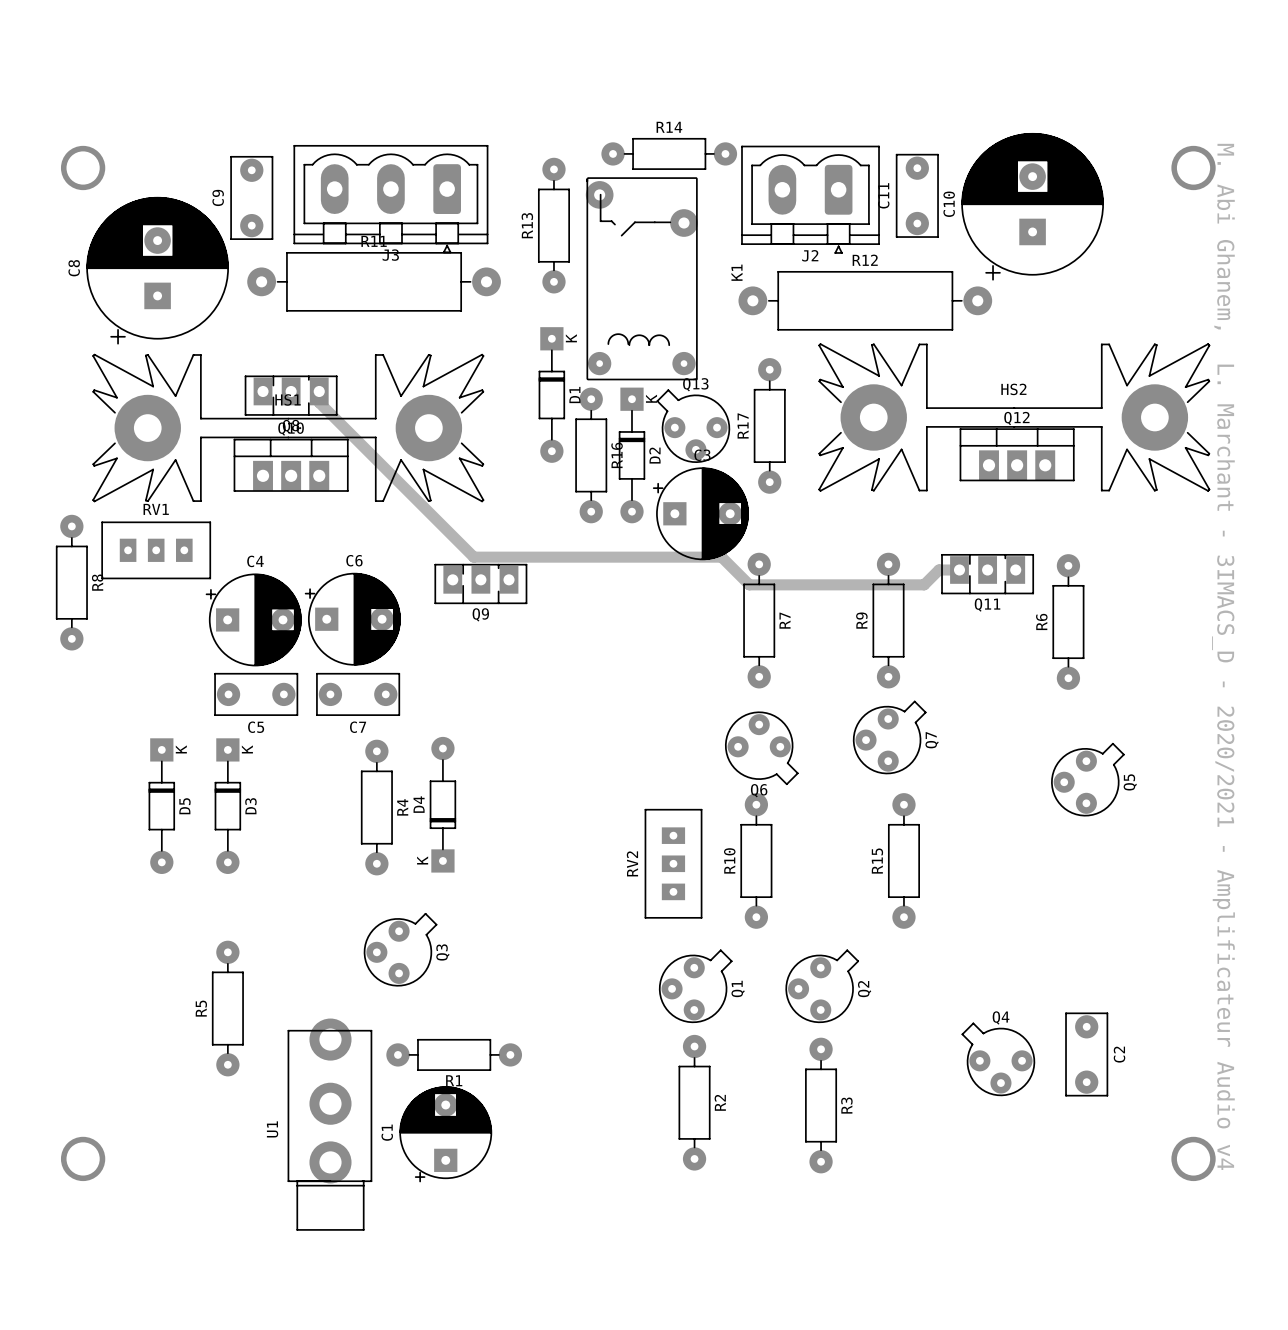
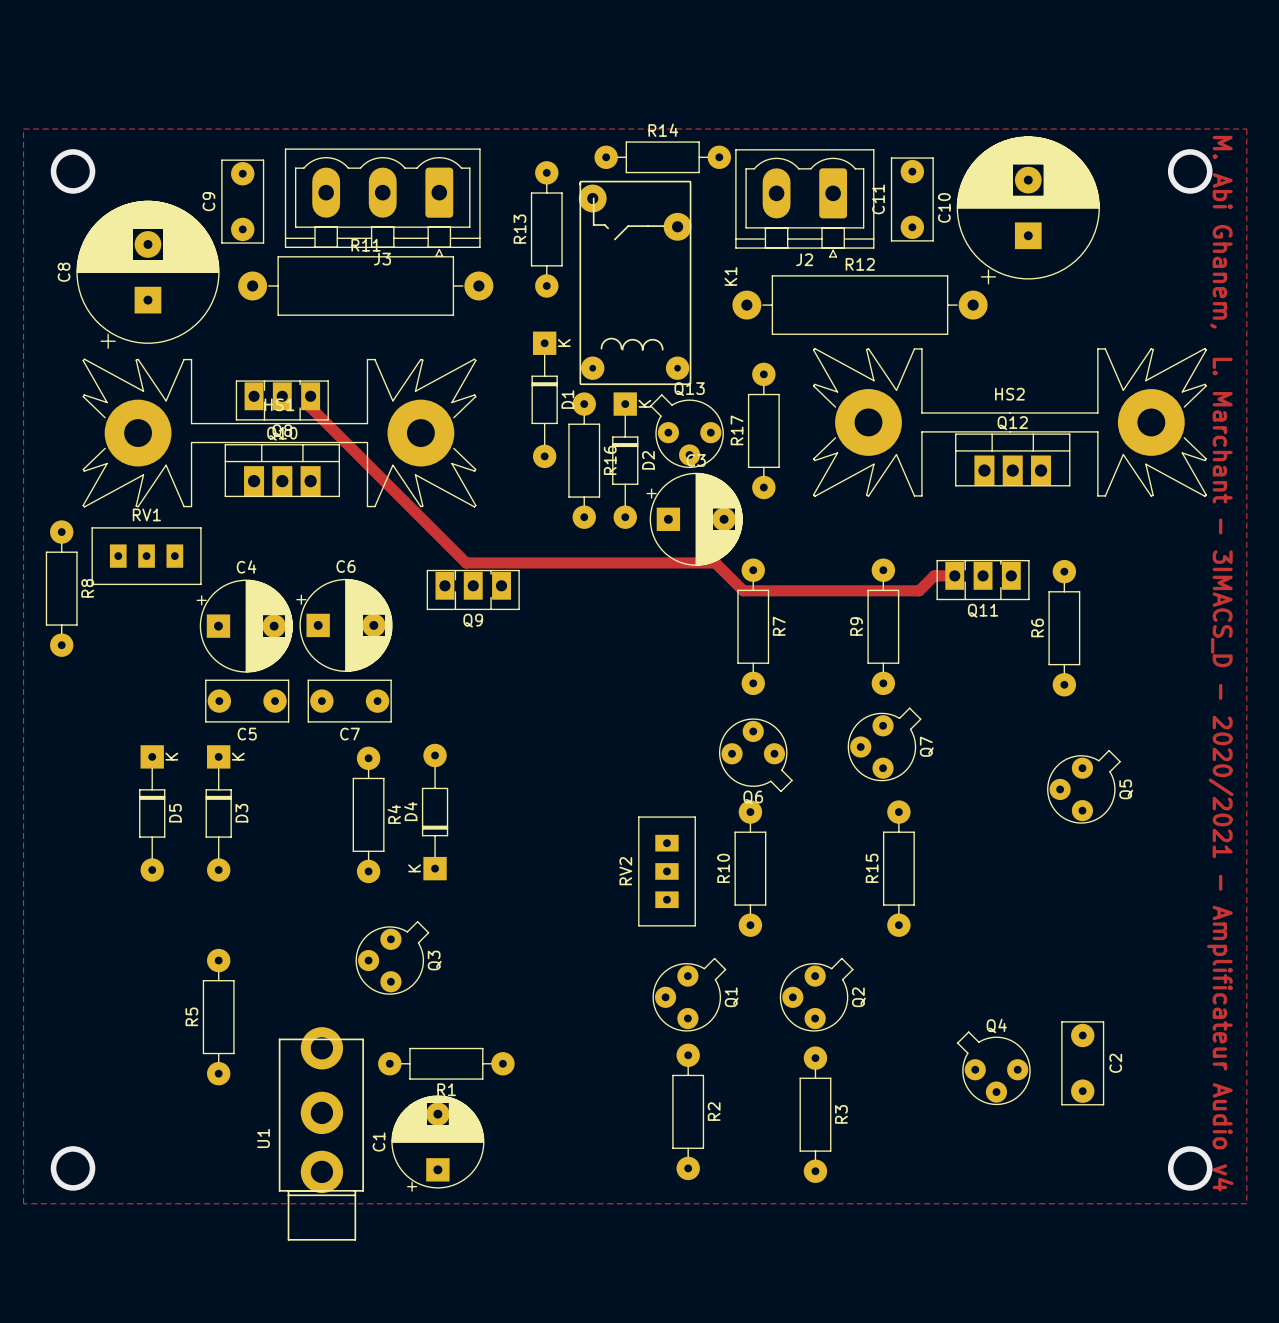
zone outline: none -> (23, 129) (23, 1203) (1246, 1203) (1246, 129) (23, 129)

